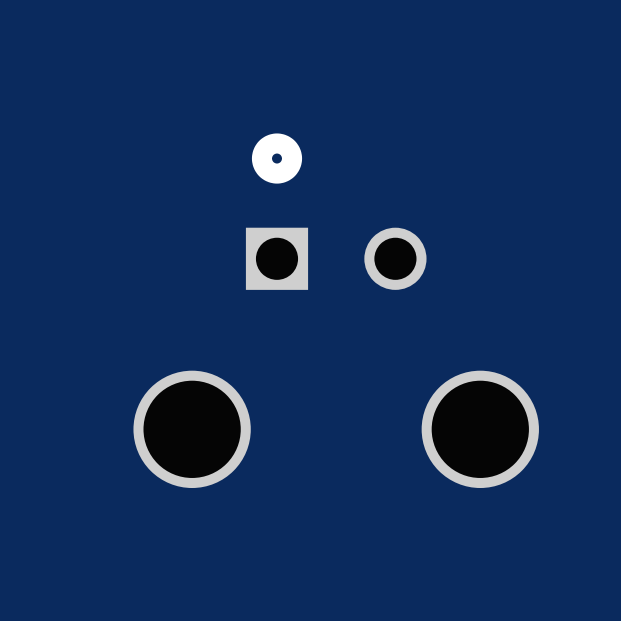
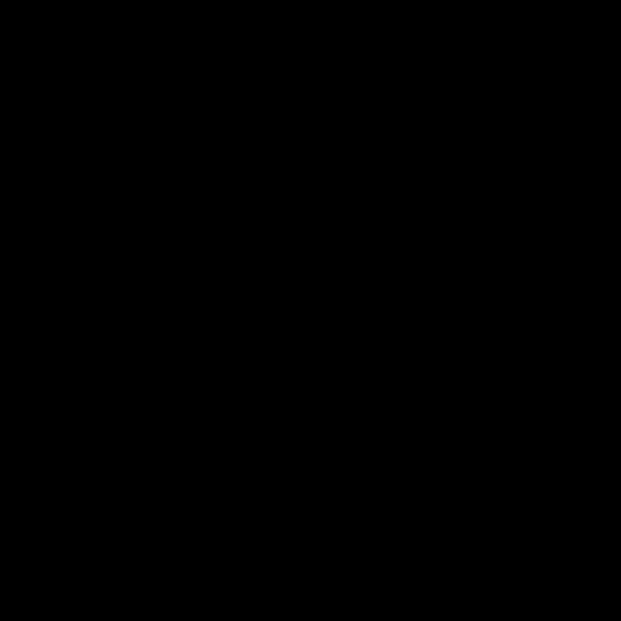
part: (336, 310) -> none

